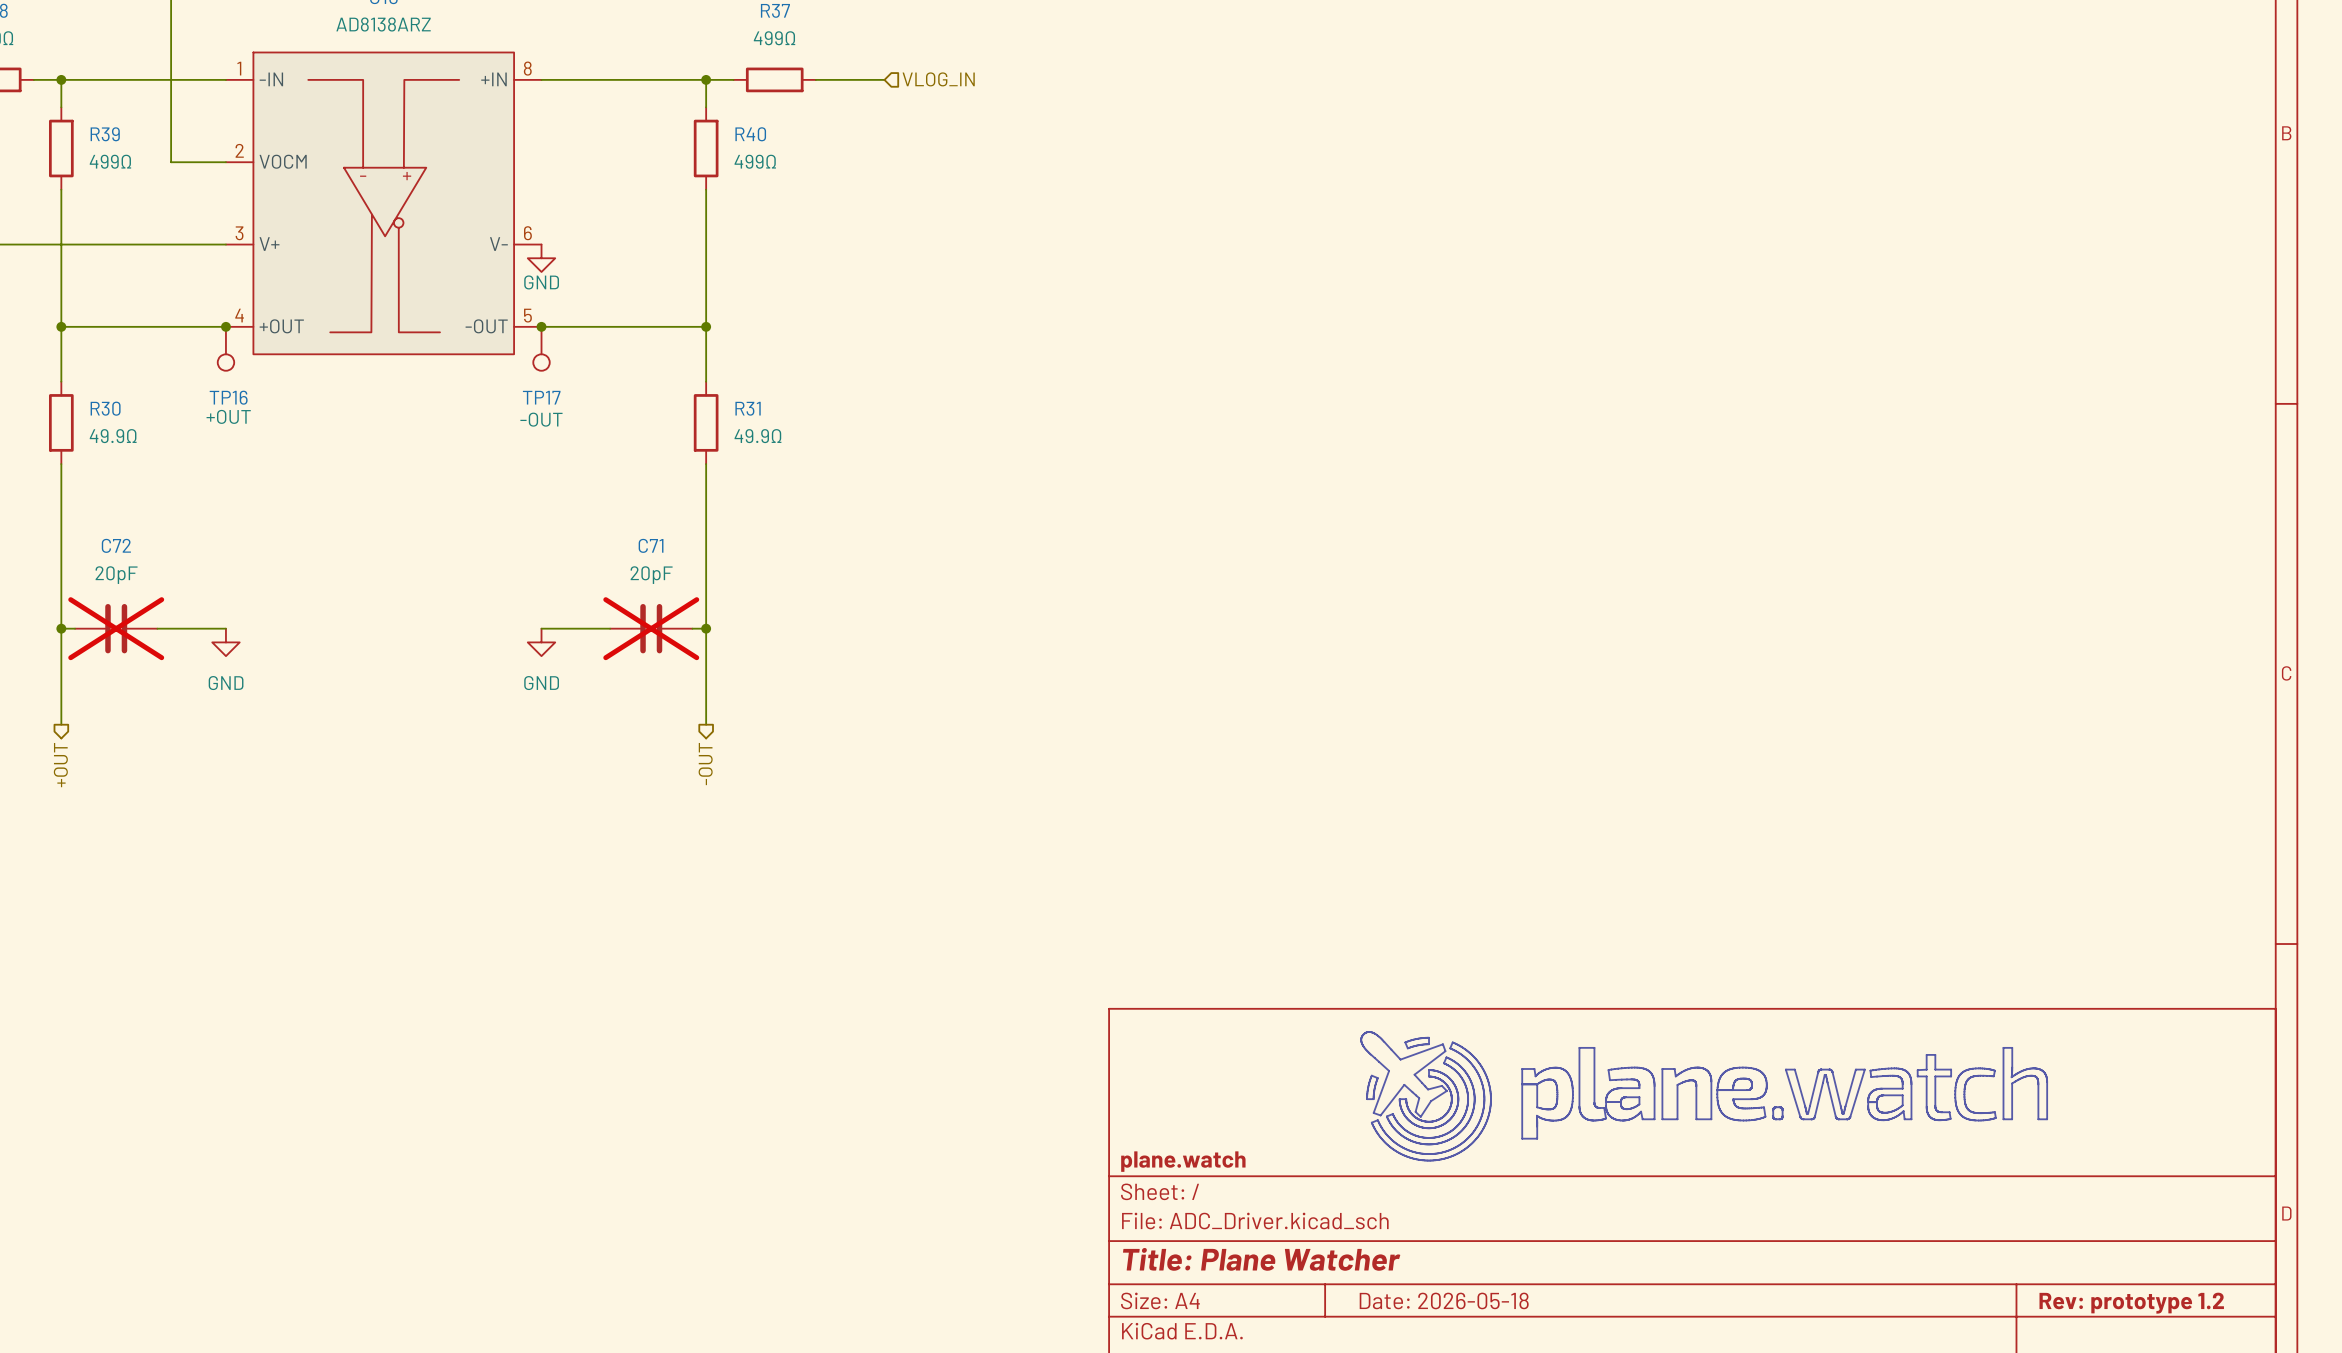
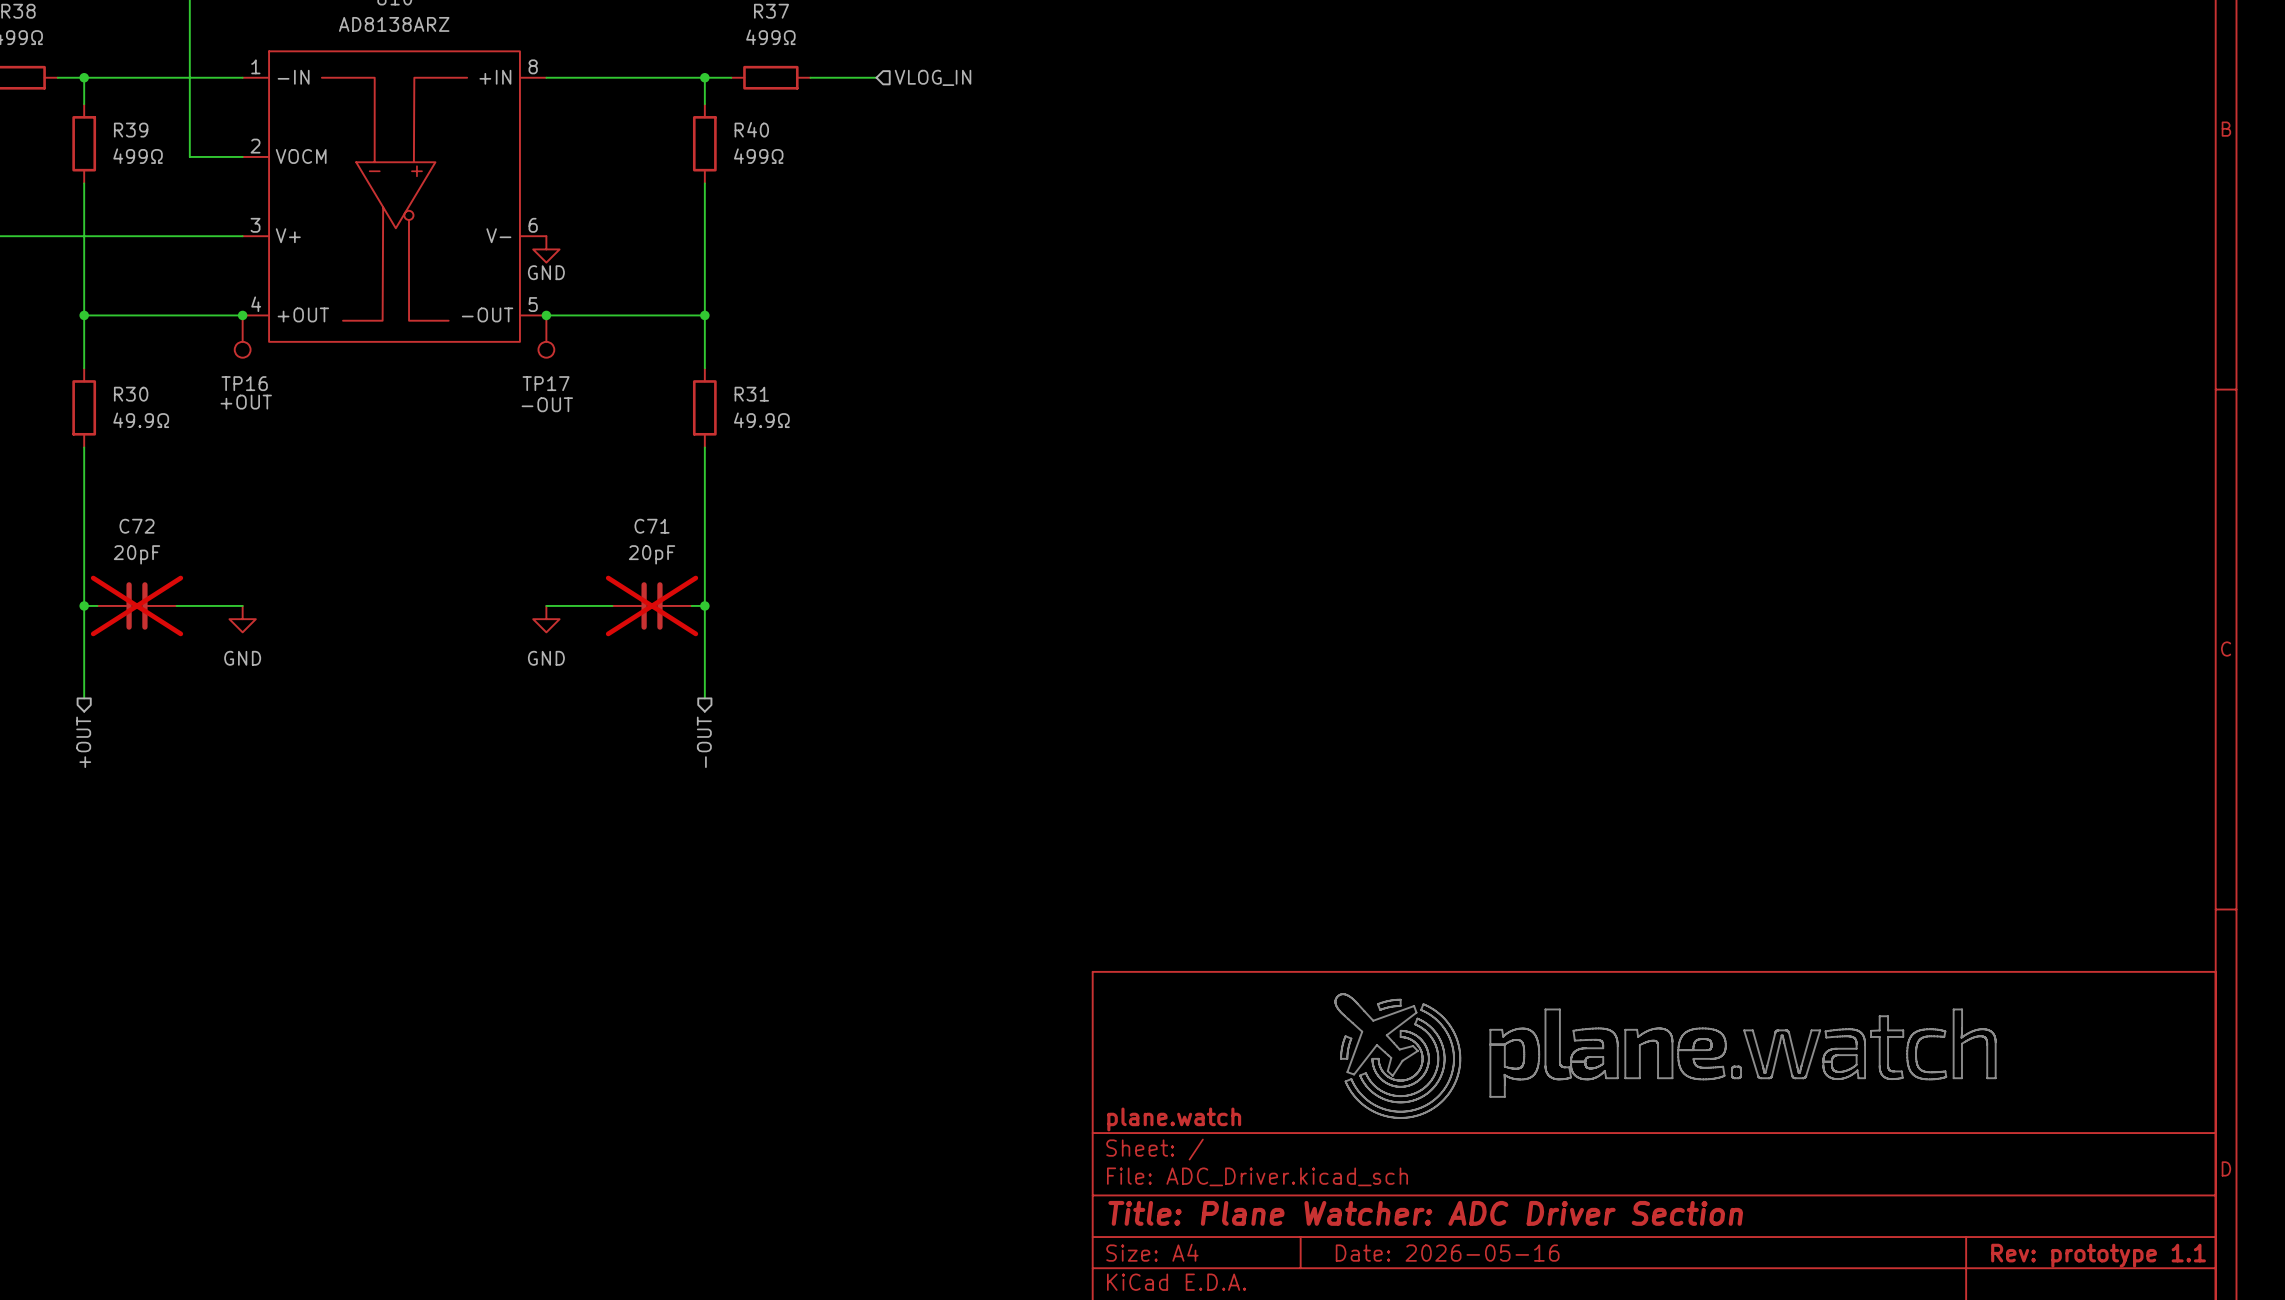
title block: Title: Plane Watcher (1261, 1259) -> Title: Plane Watcher: ADC Driver Section (1425, 1213)
title block: Date: 2026-05-18 (1444, 1300) -> Date: 2026-05-16 (1447, 1253)
title block: Rev: prototype 1.2 (2131, 1303) -> Rev: prototype 1.1 (2098, 1255)

